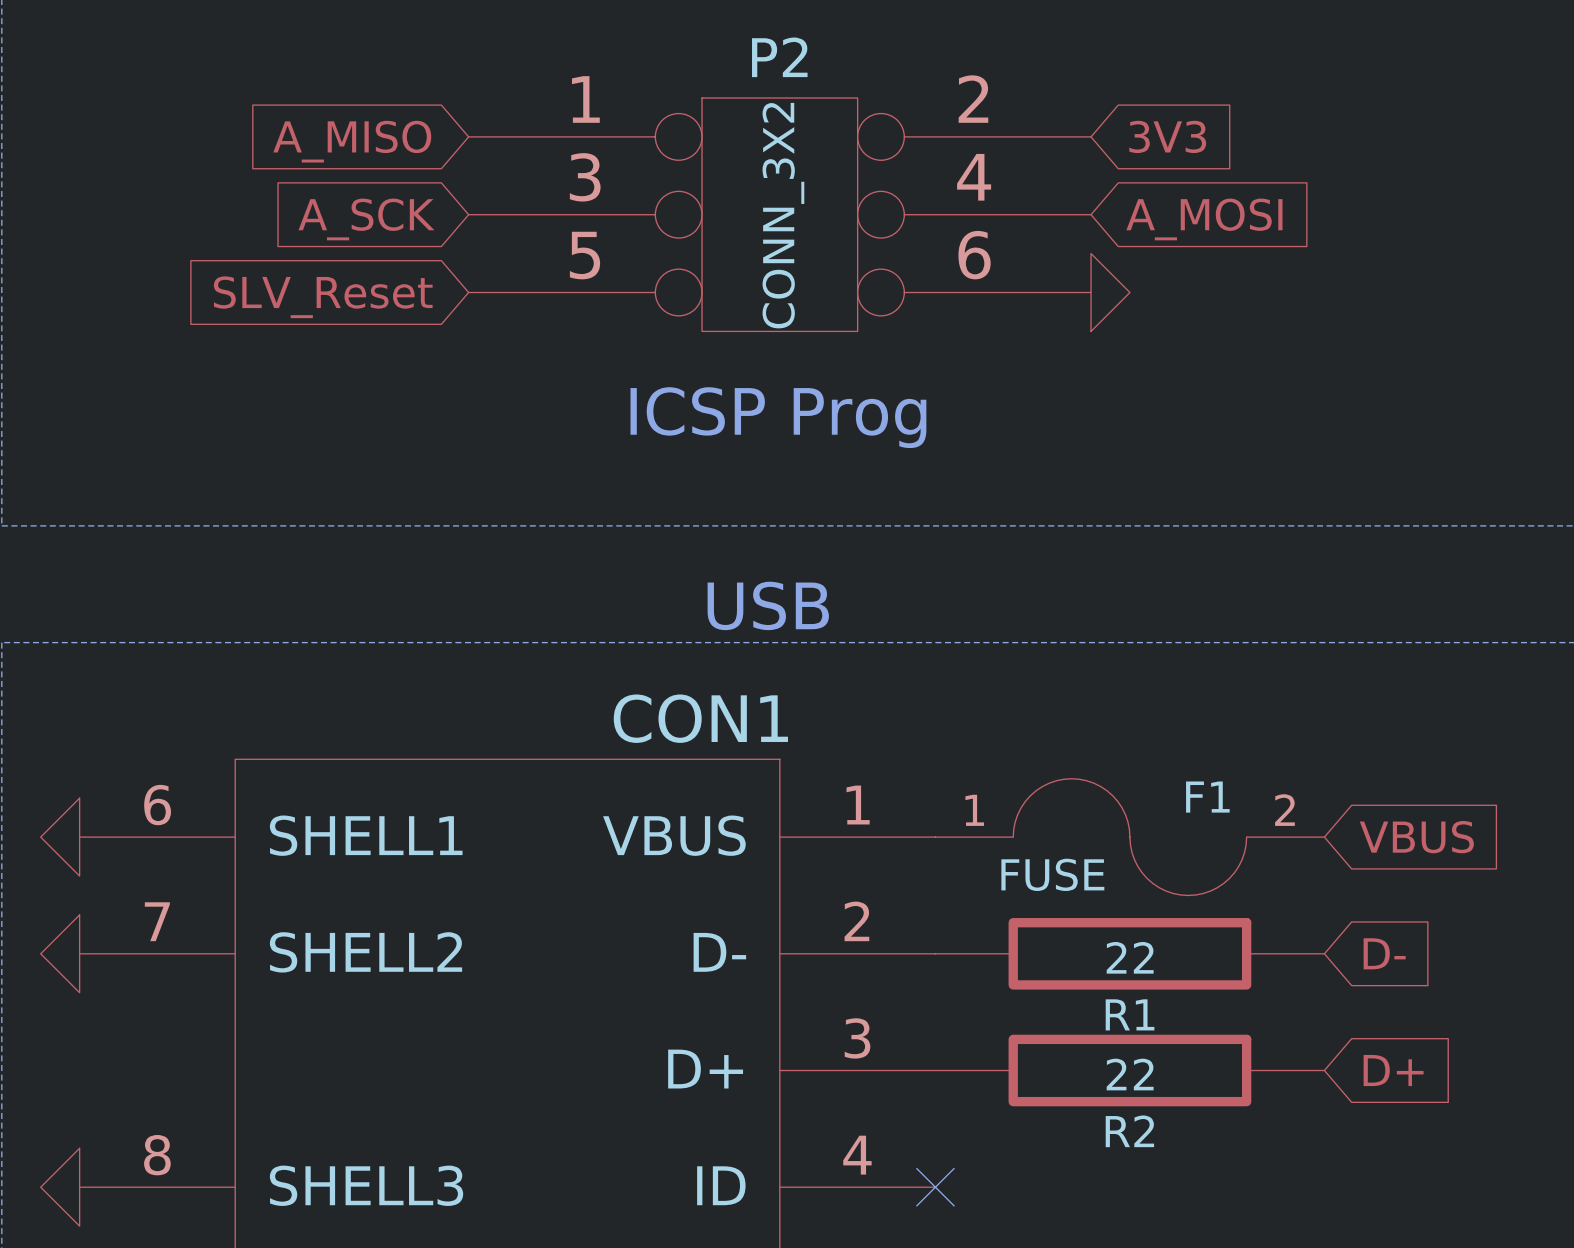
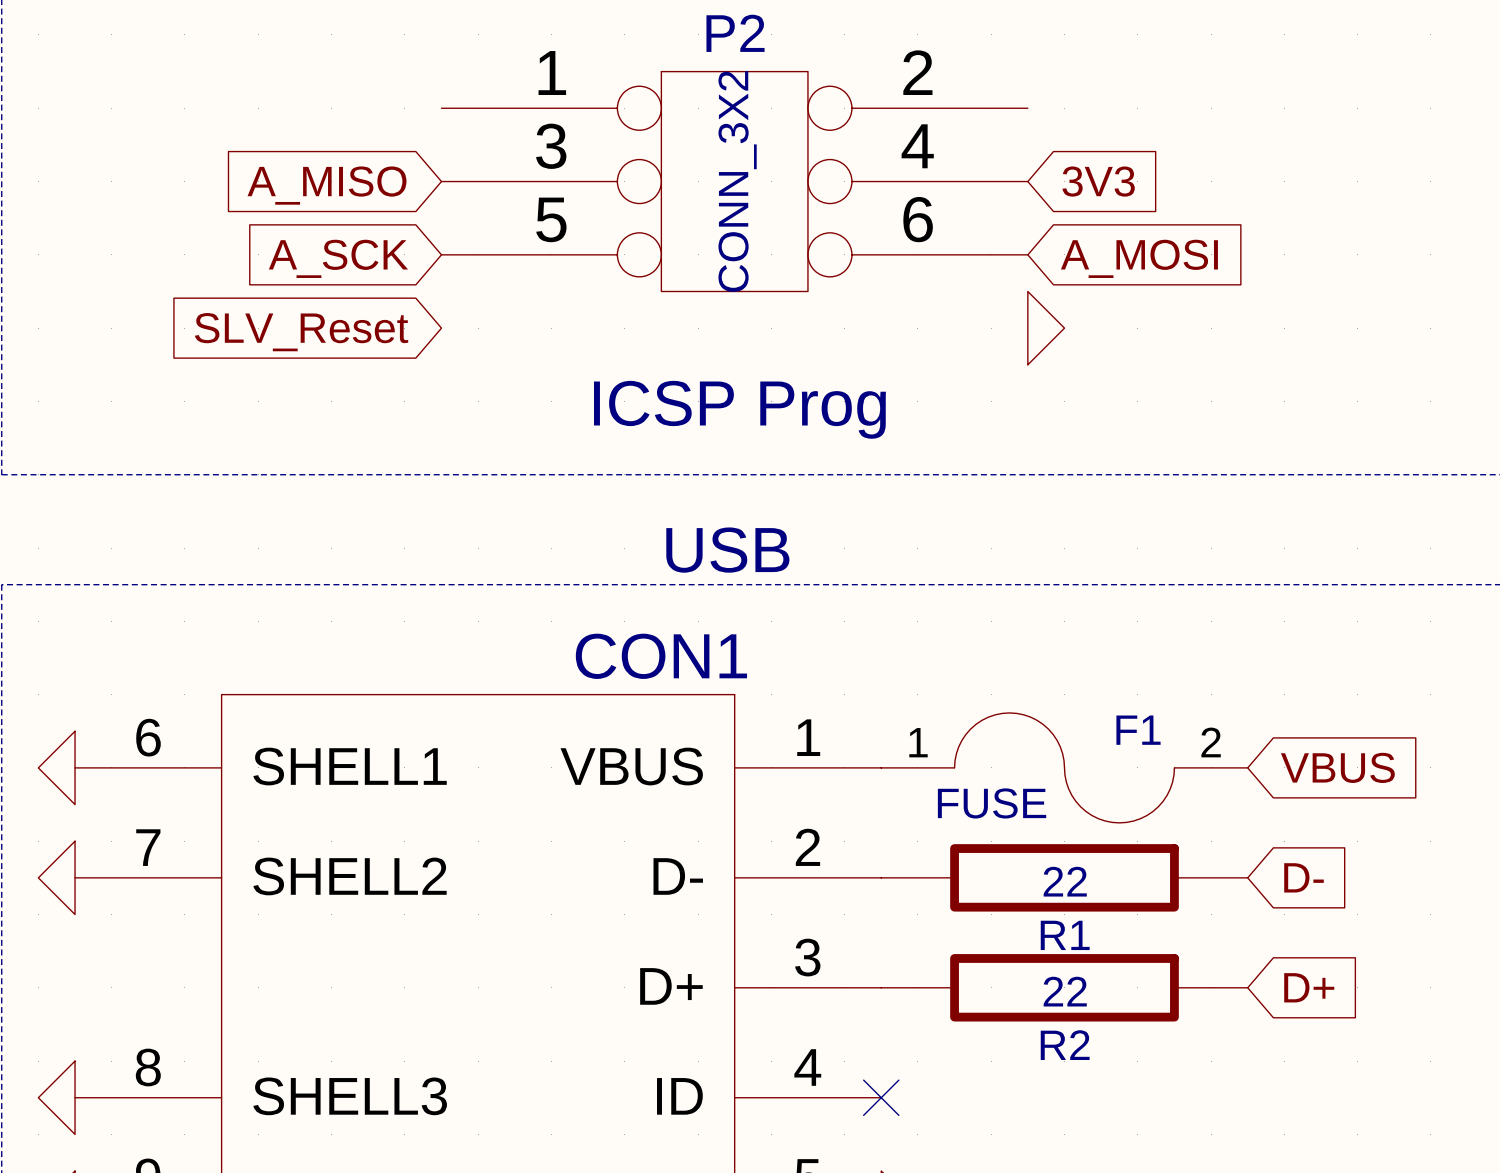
global label: 3V3 (1167, 136) -> none
global label: A_MISO (352, 141) -> none
global label: A_SCK (366, 219) -> A_MISO (327, 185)
global label: A_MOSI (1204, 219) -> 3V3 (1098, 181)
power symbol position: (1110, 292) -> (1046, 328)
global label: SLV_Reset (323, 297) -> A_SCK (338, 258)
global label: none -> A_MOSI (1139, 258)
global label: none -> SLV_Reset (301, 332)
text position: ICSP Prog (778, 417) -> ICSP Prog (739, 409)

